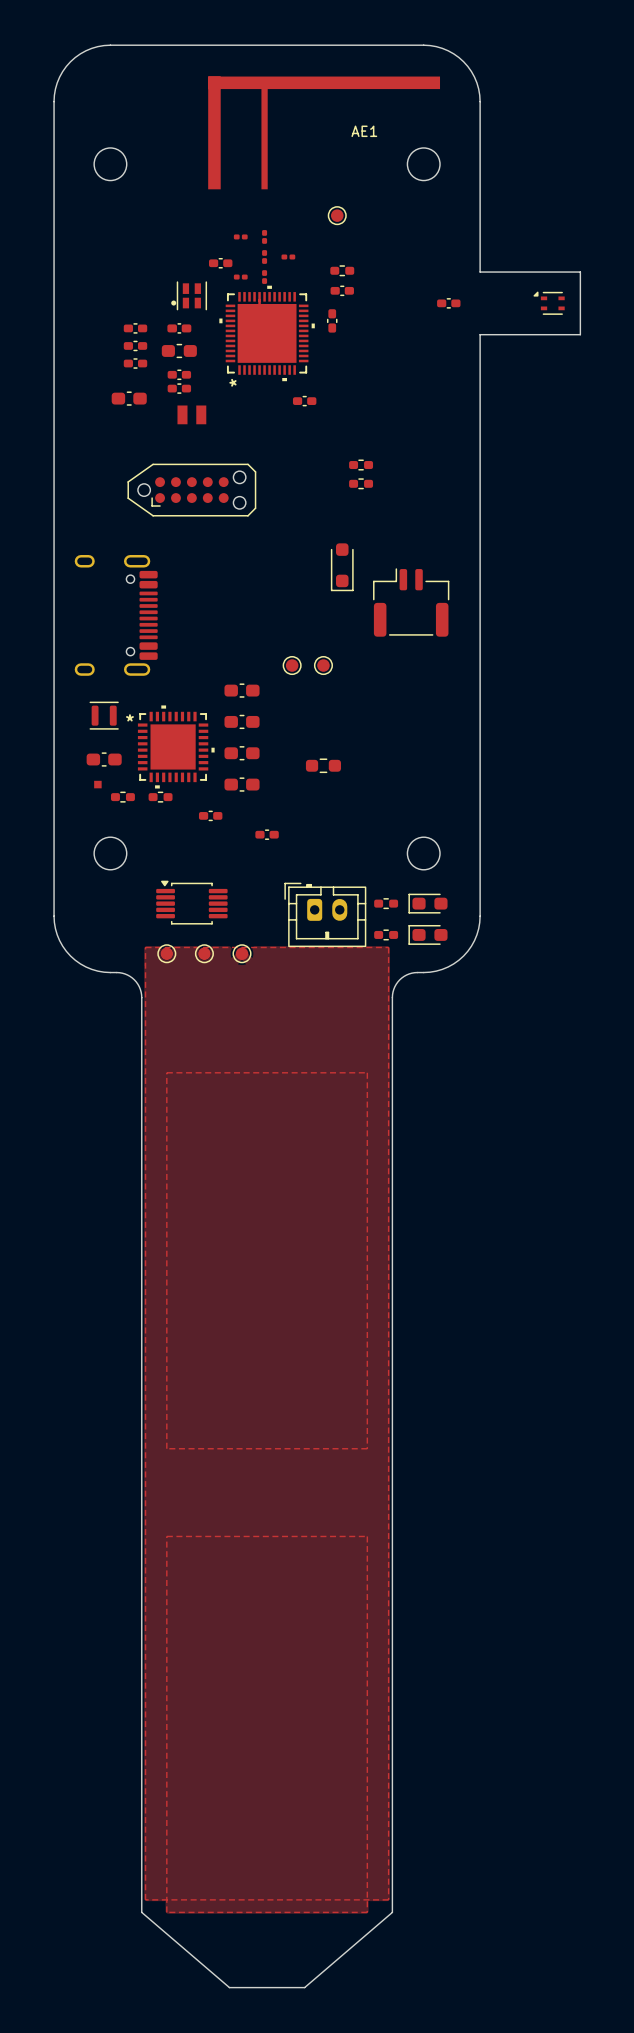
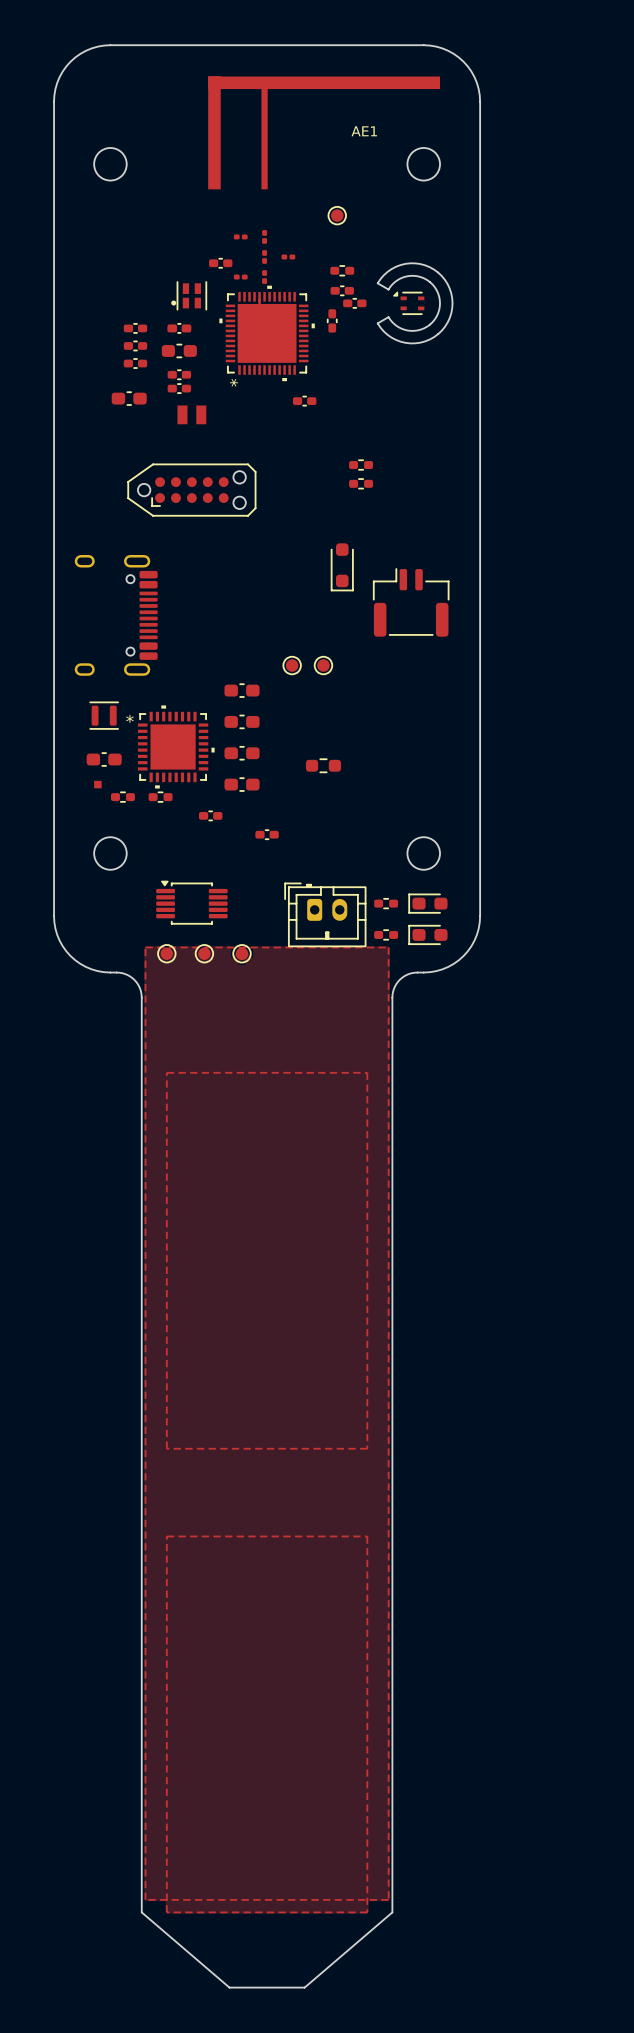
board edge: none -> (438, 272) (420, 264) (405, 263) (391, 269) (380, 279) (377, 283) (388, 289) (401, 278) (411, 275) (421, 277) (434, 287) (439, 299) (438, 313) (427, 326) (417, 330) (407, 330) (398, 326) (388, 317) (377, 323) (387, 334) (400, 341) (420, 342) (434, 337) (445, 326) (451, 313) (452, 298) (447, 284) (438, 272)
board edge: (480, 272) (580, 272) (580, 334) (480, 334) -> (480, 272) (480, 334)
part position: (448, 303) -> (354, 303)
part position: (549, 303) -> (408, 303)

